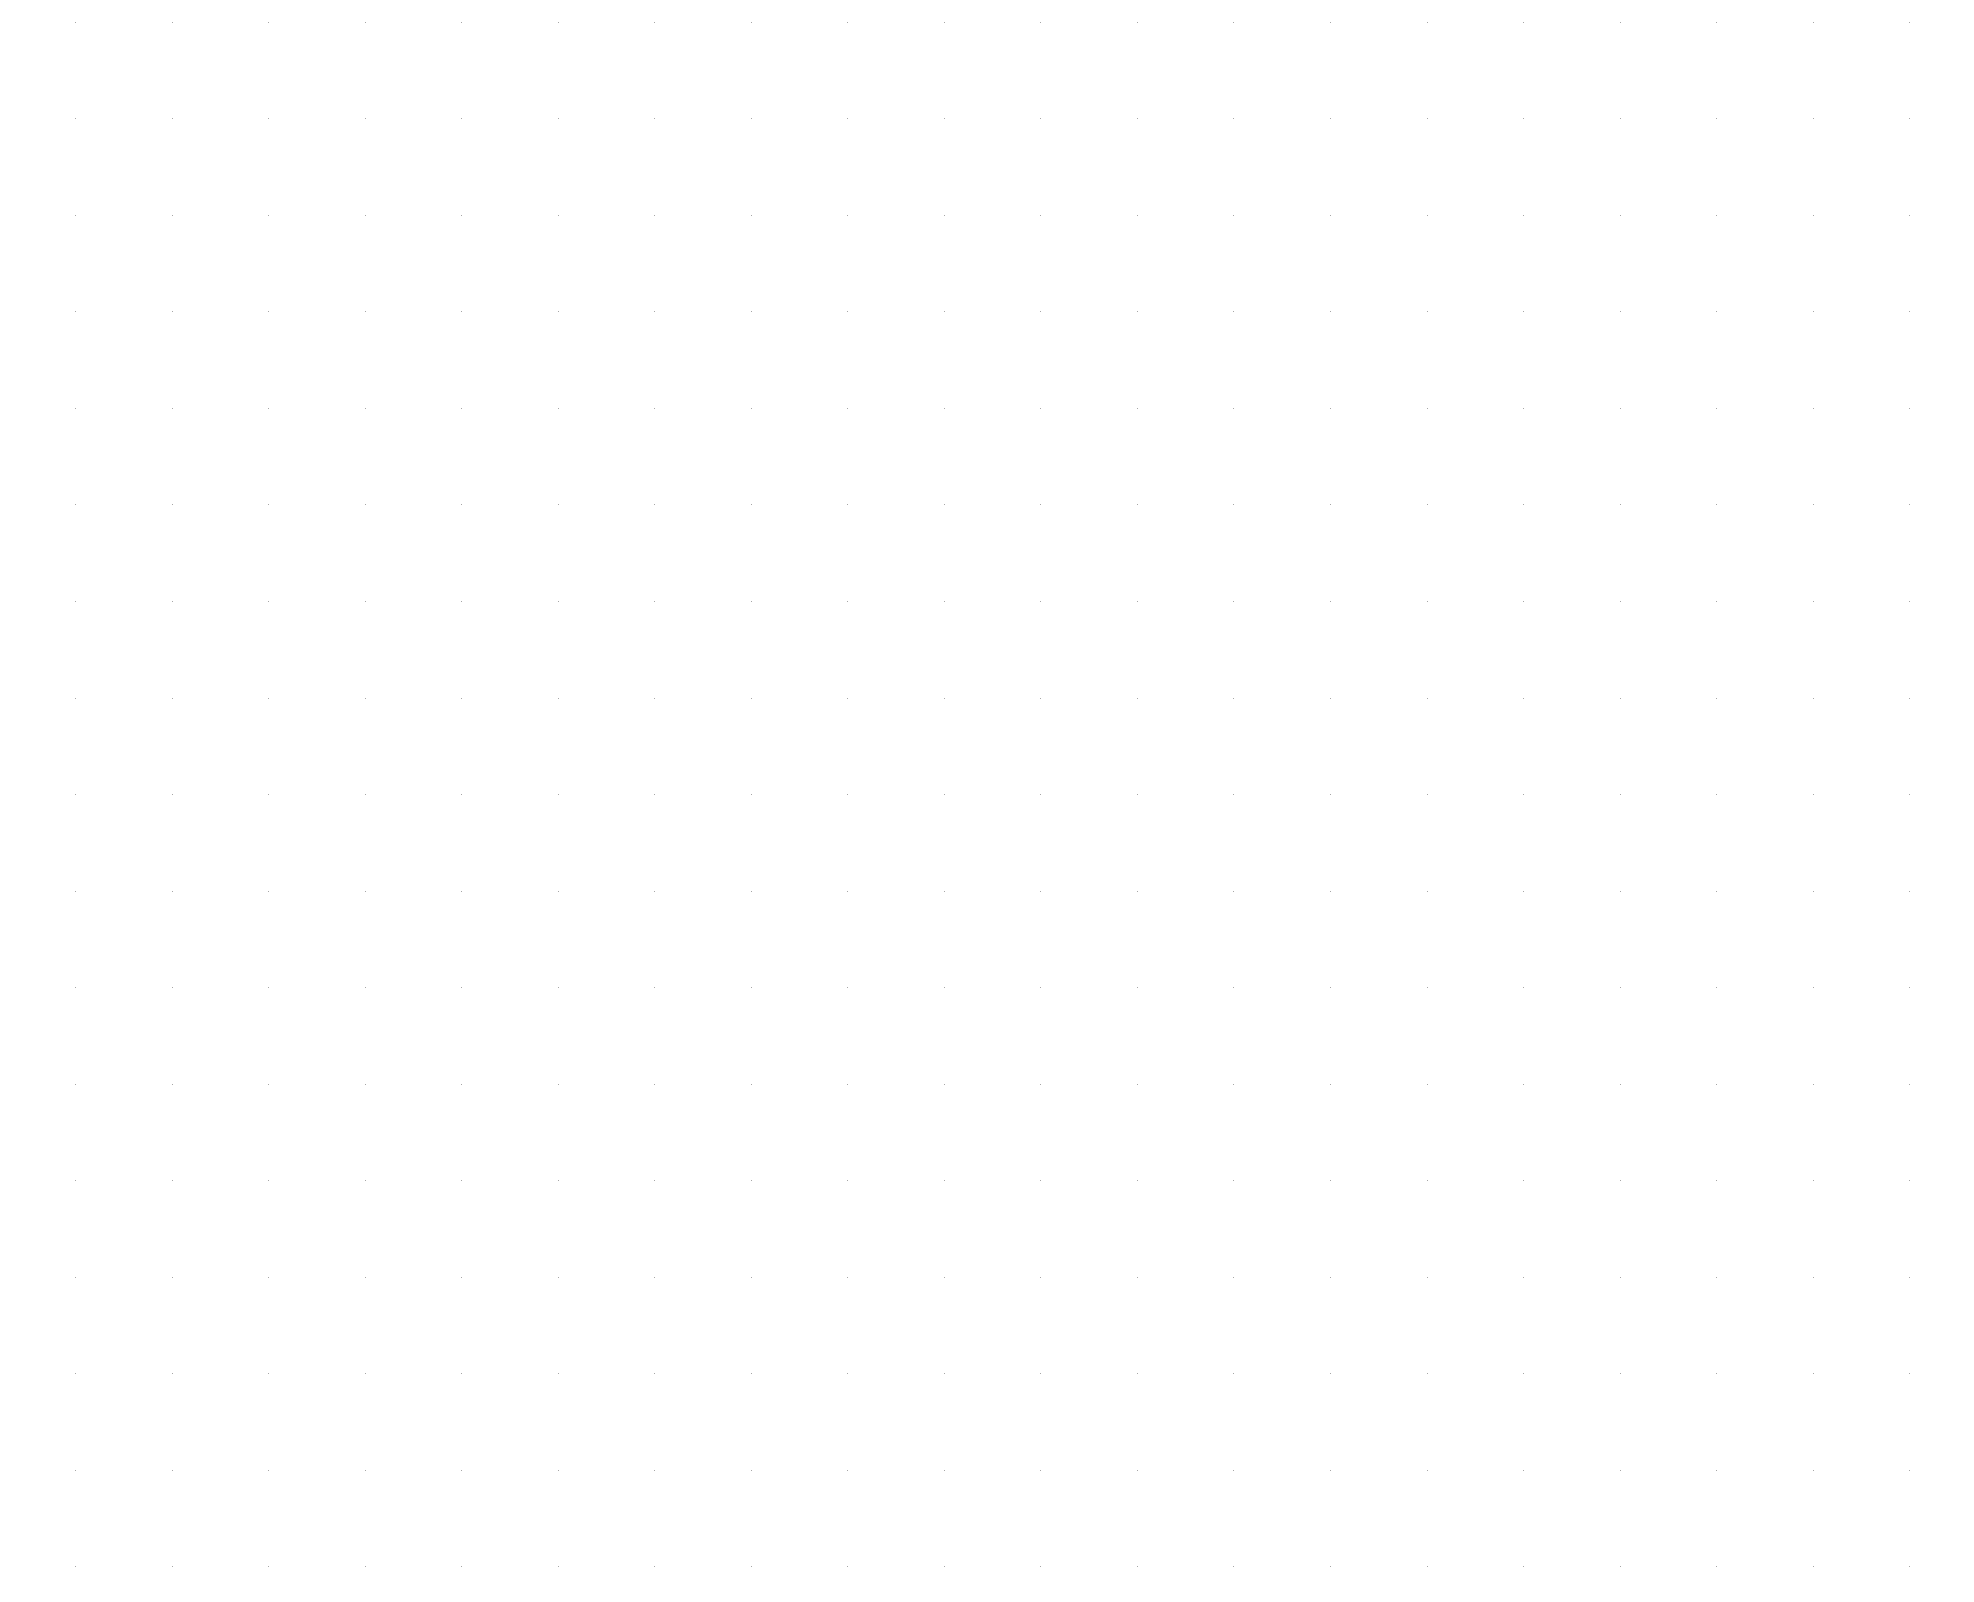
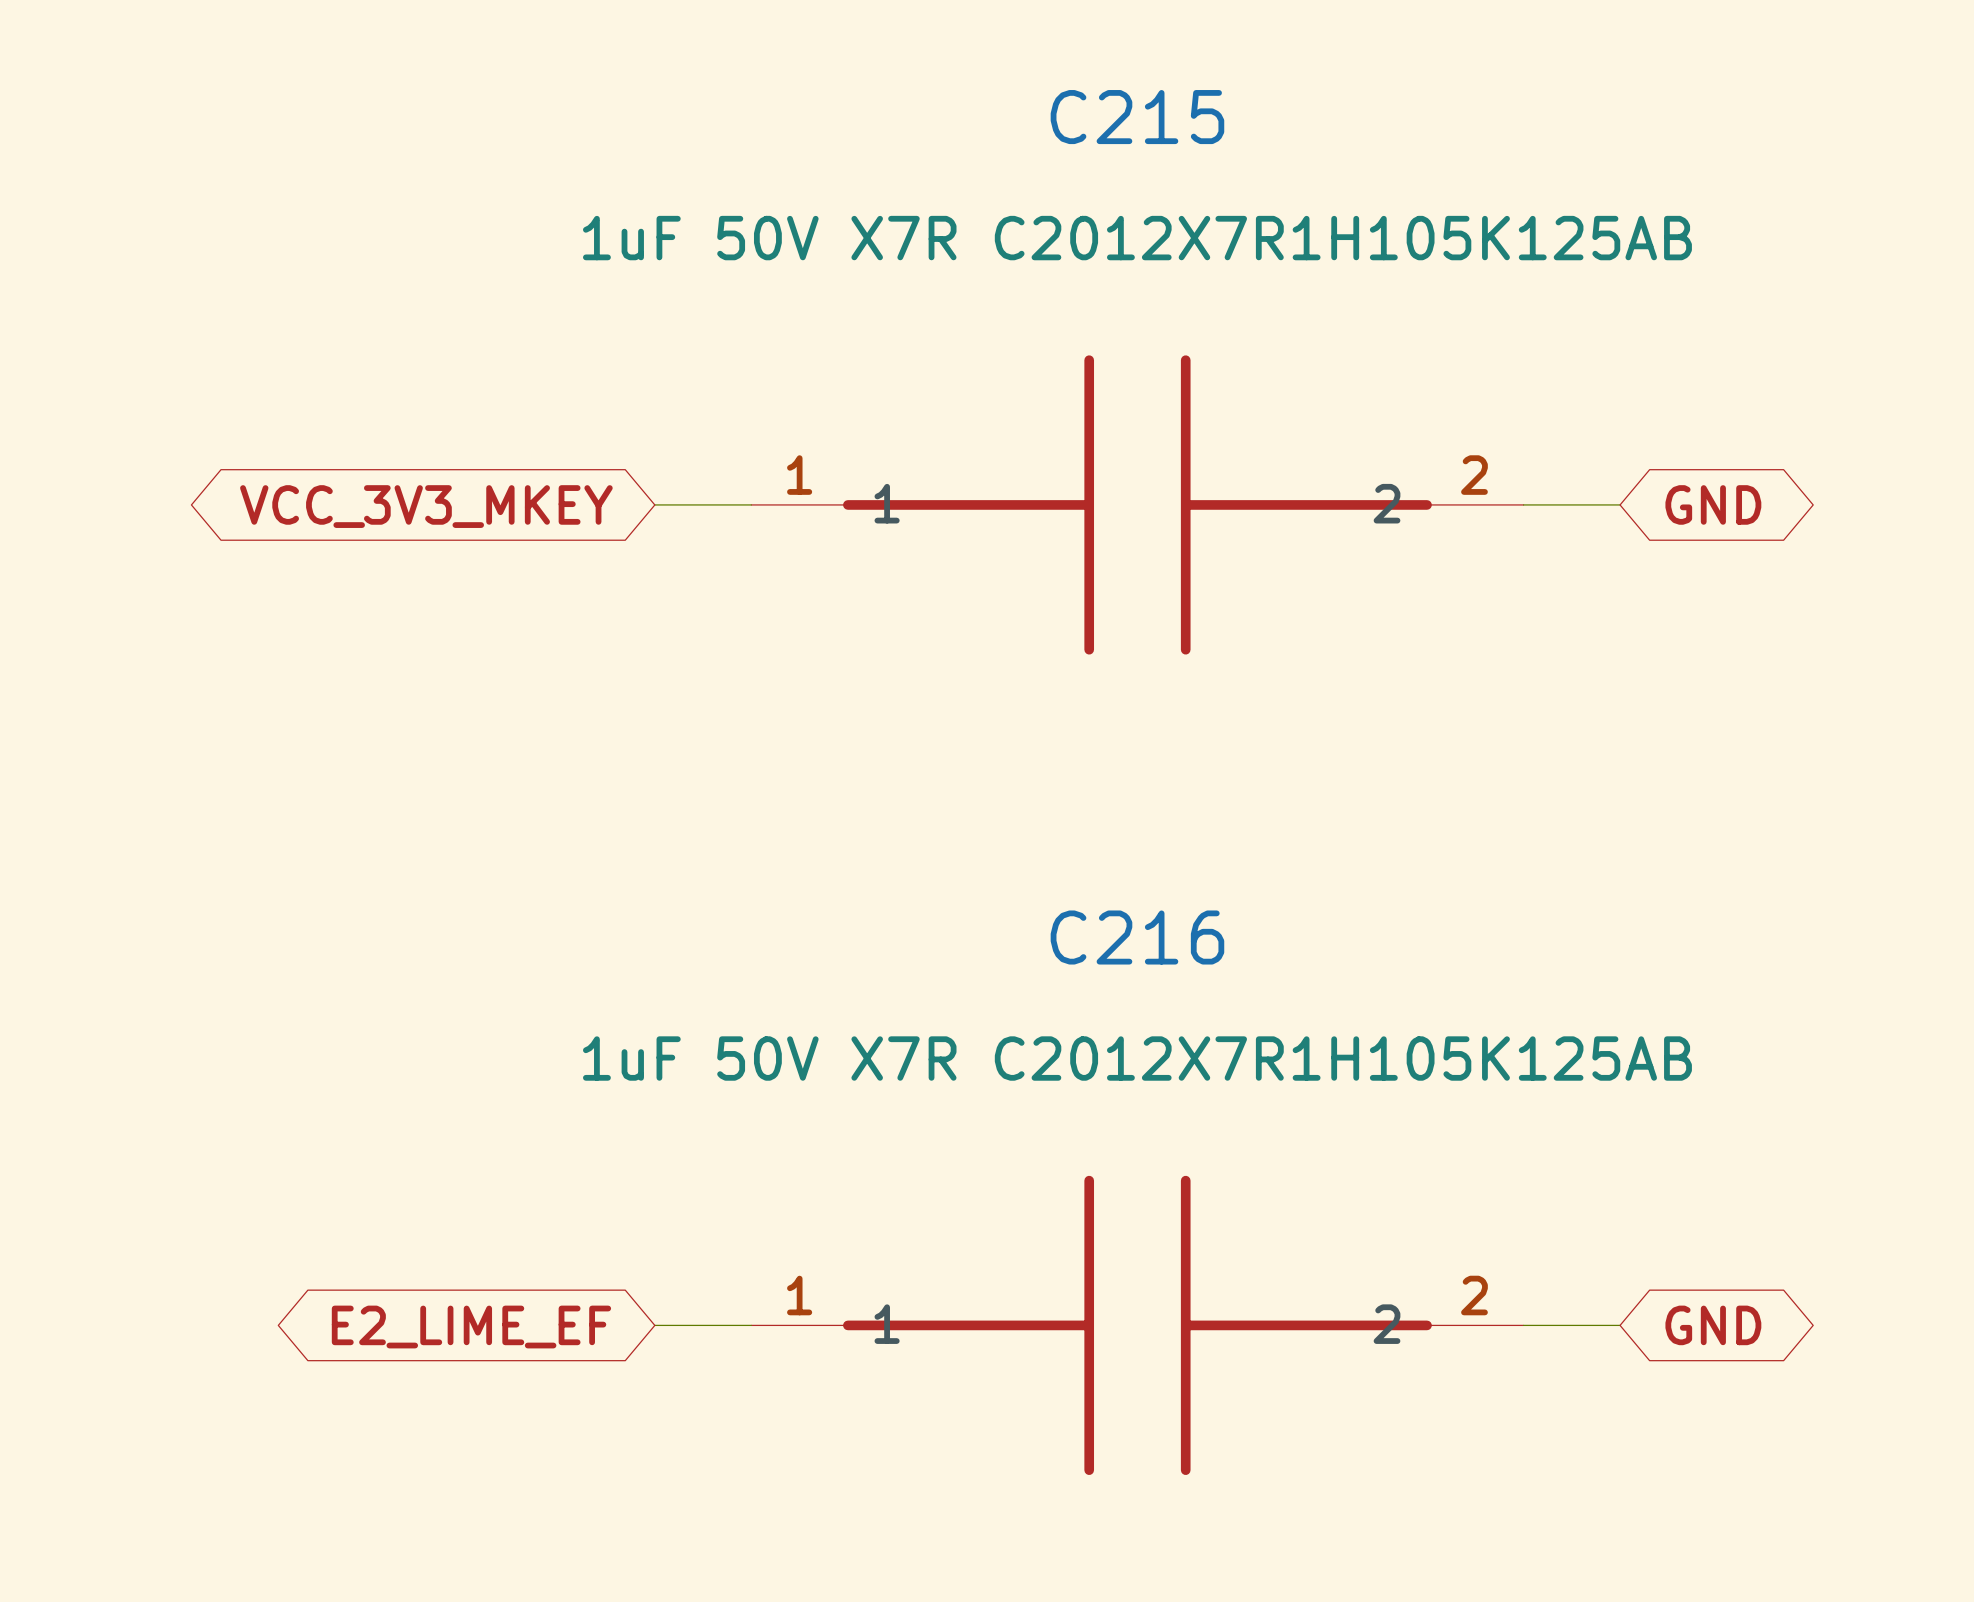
wire: none -> (654, 504) (751, 504)
C215: none -> 1uF 50V X7R C2012X7R1H105K125AB (1137, 504)
wire: none -> (1523, 504) (1620, 504)
global label: none -> GND (1713, 504)
global label: none -> VCC_3V3_MKEY (426, 506)
wire: none -> (654, 1325) (751, 1325)
C216: none -> 1uF 50V X7R C2012X7R1H105K125AB (1137, 1325)
wire: none -> (1523, 1325) (1620, 1325)
global label: none -> GND (1713, 1325)
global label: none -> E2_LIME_EF (471, 1327)

